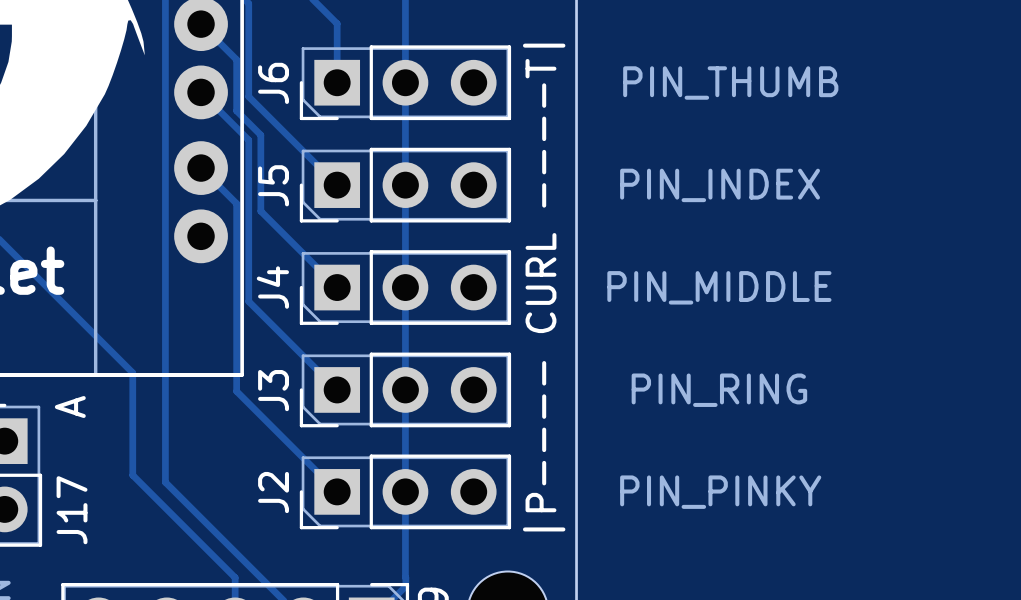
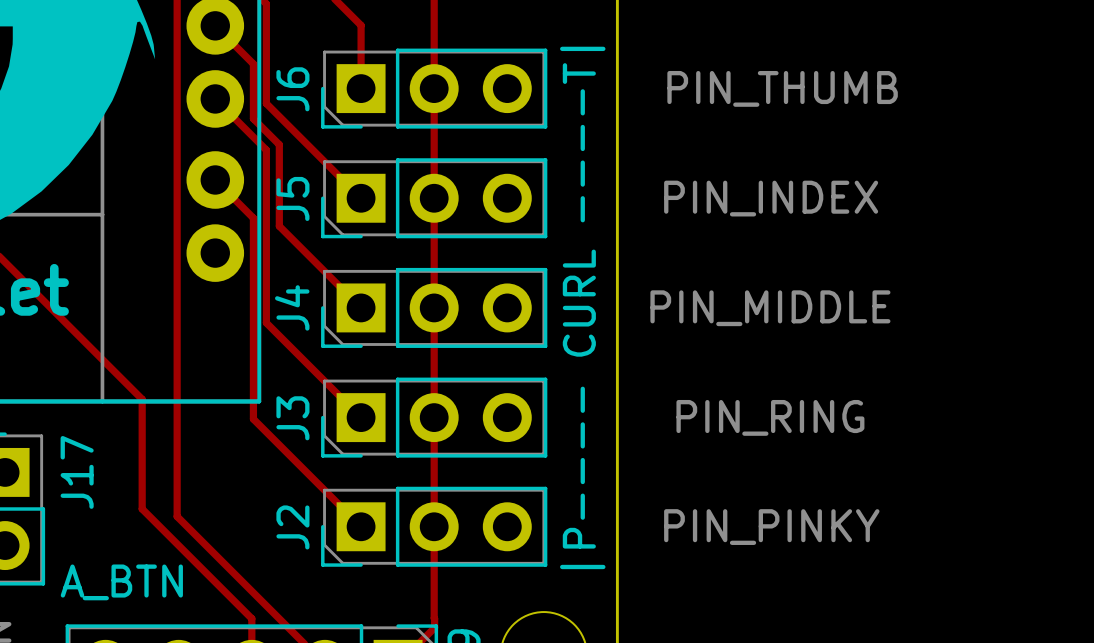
text: A (70, 407) -> none
J17 name position: J17 (72, 510) -> J17 (77, 472)
text: none -> A_BTN (121, 582)

